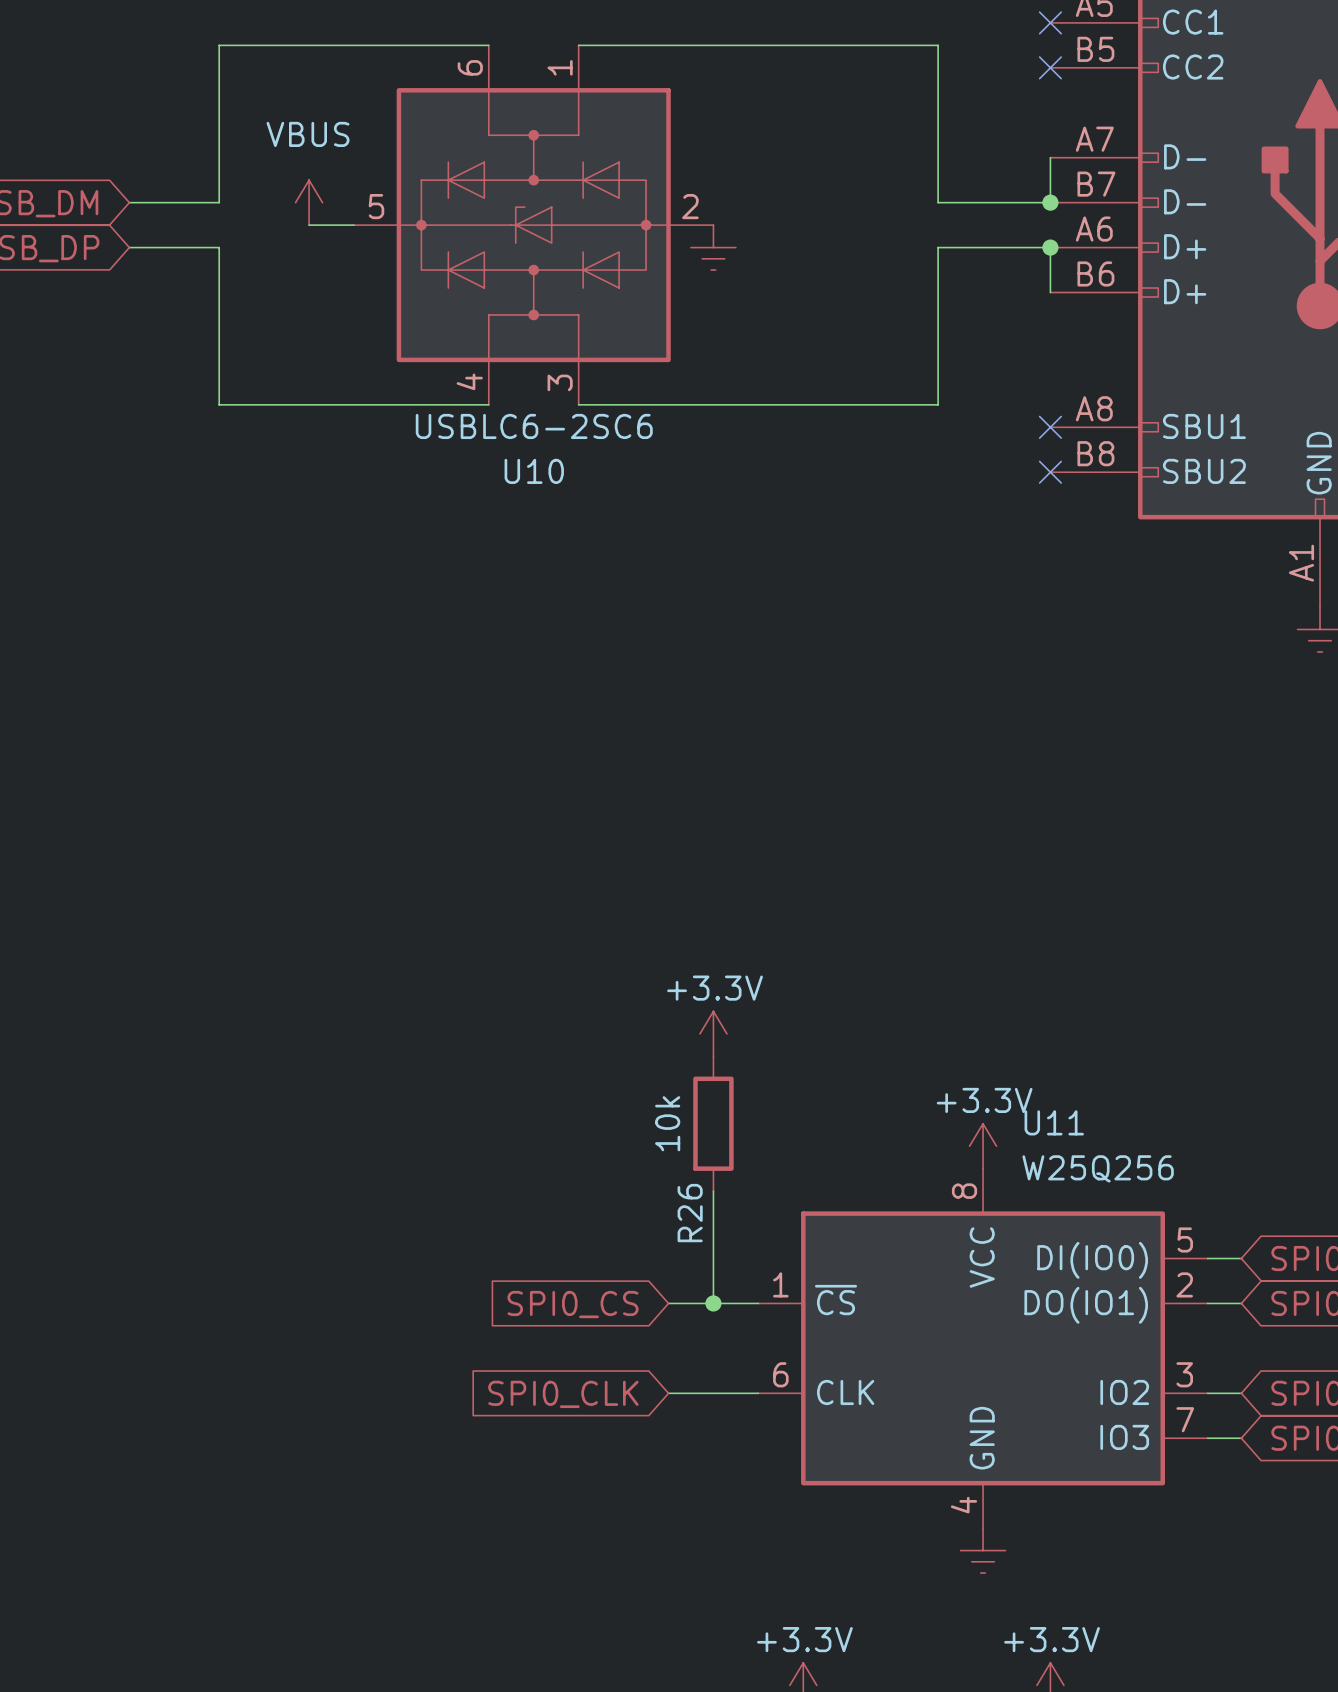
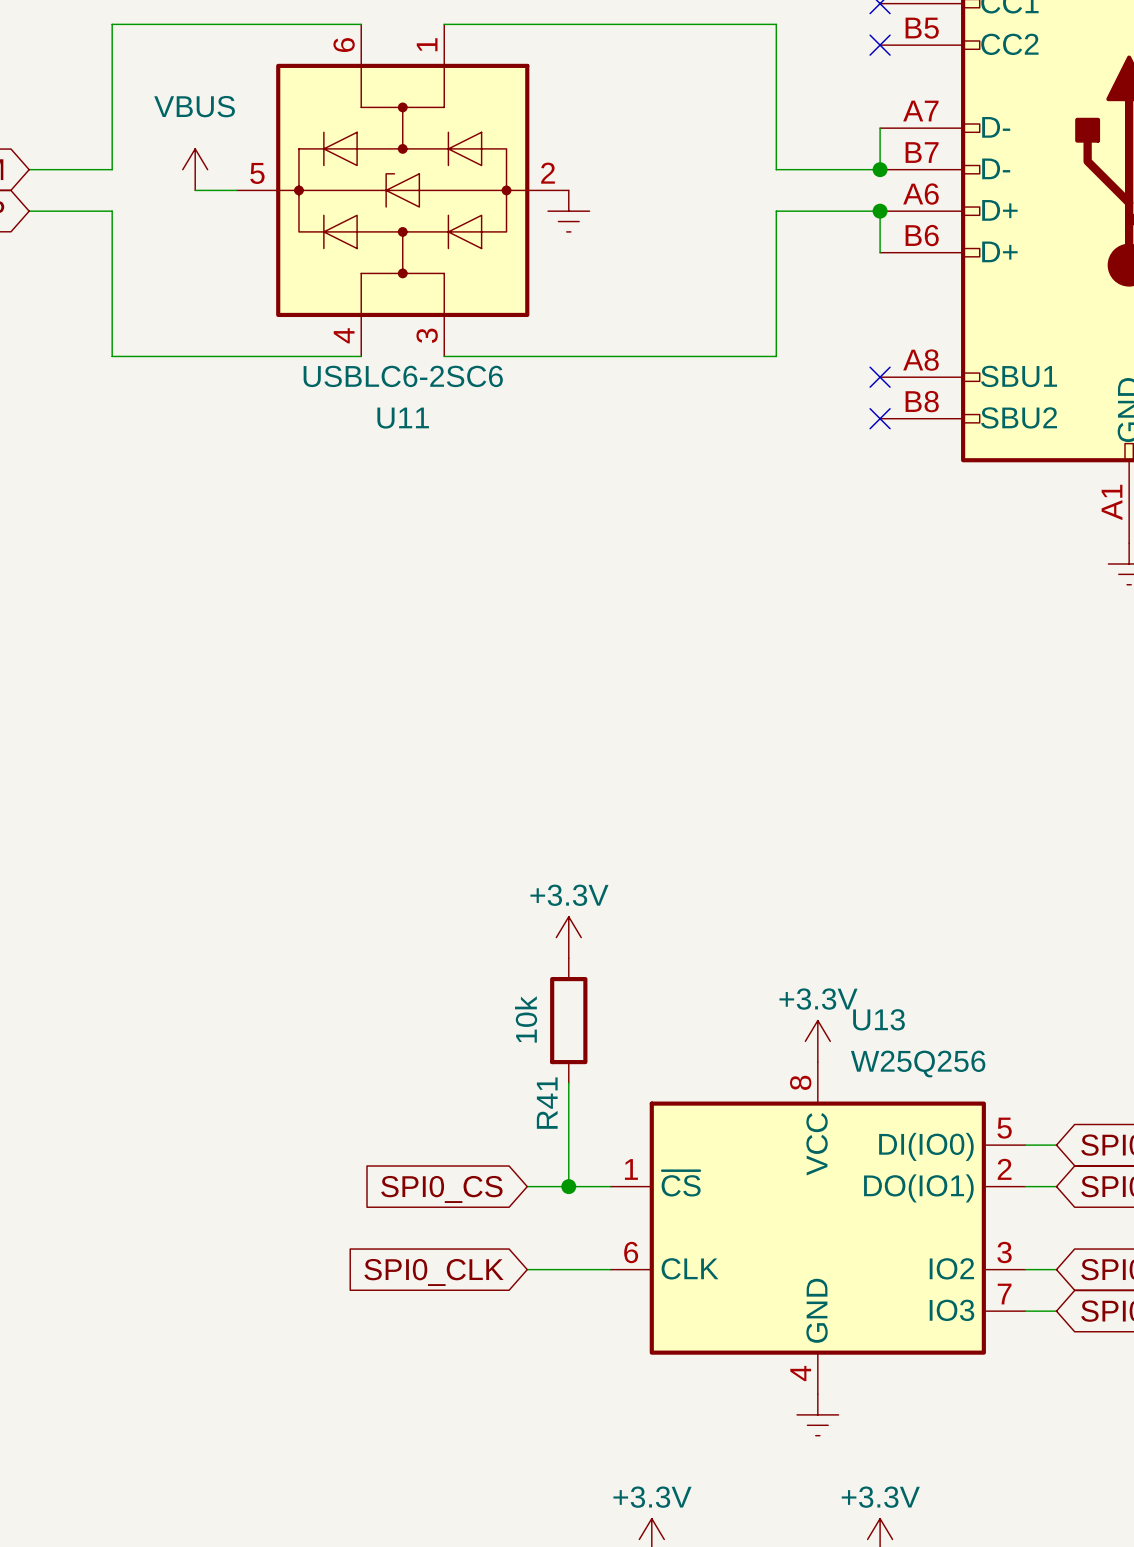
U10 name: U10 (534, 471) -> U11 (403, 418)
U11 name: U11 (1054, 1122) -> U13 (879, 1019)
R26 name: R26 (690, 1213) -> R41 (547, 1103)

